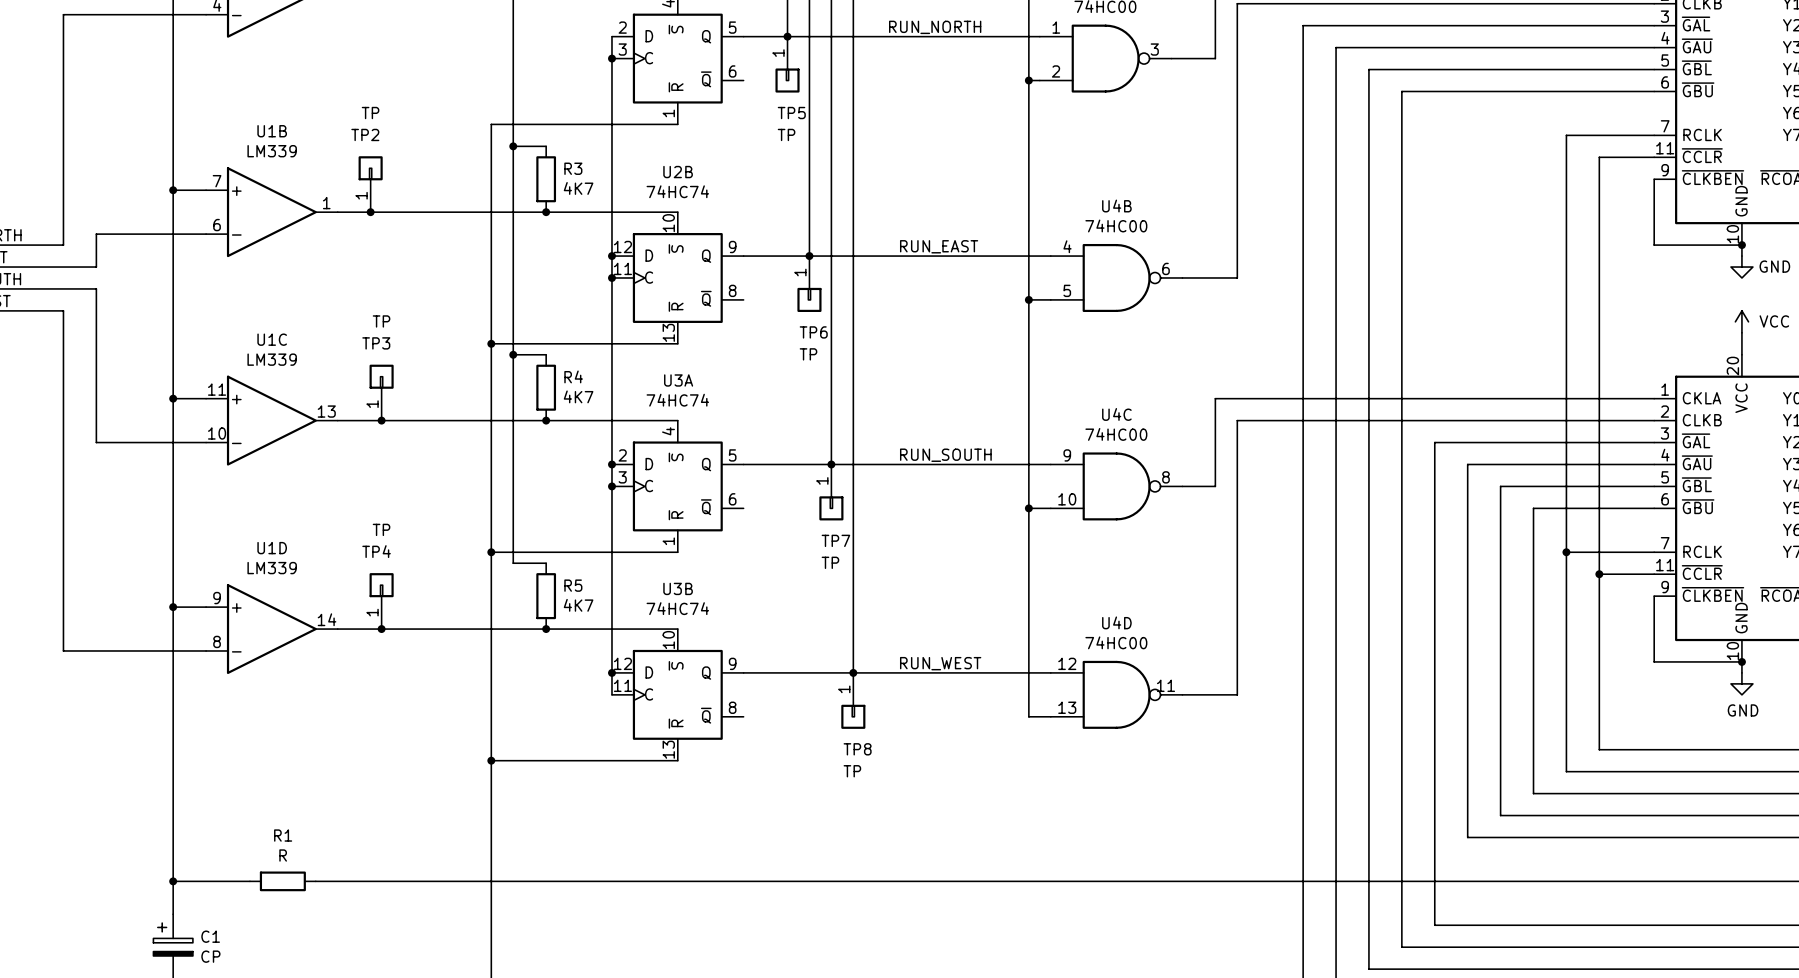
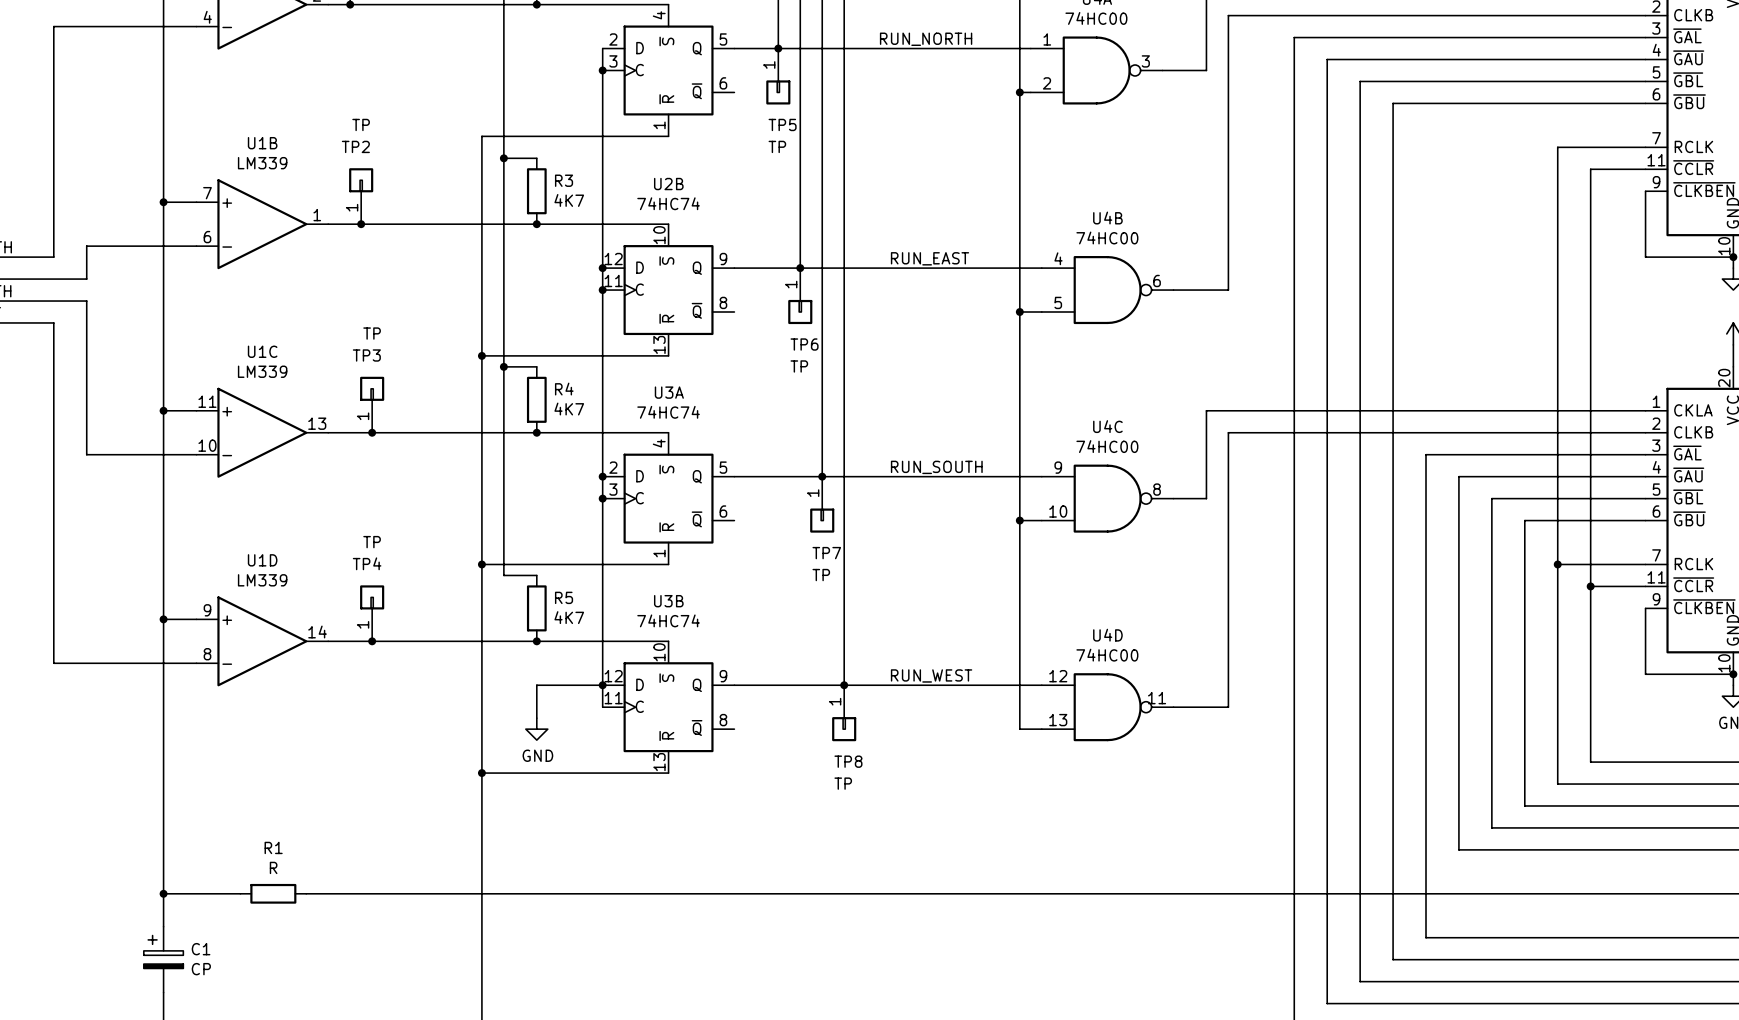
wire: none -> (602, 685) (536, 685) (536, 718)
power symbol: none -> GND (536, 729)

